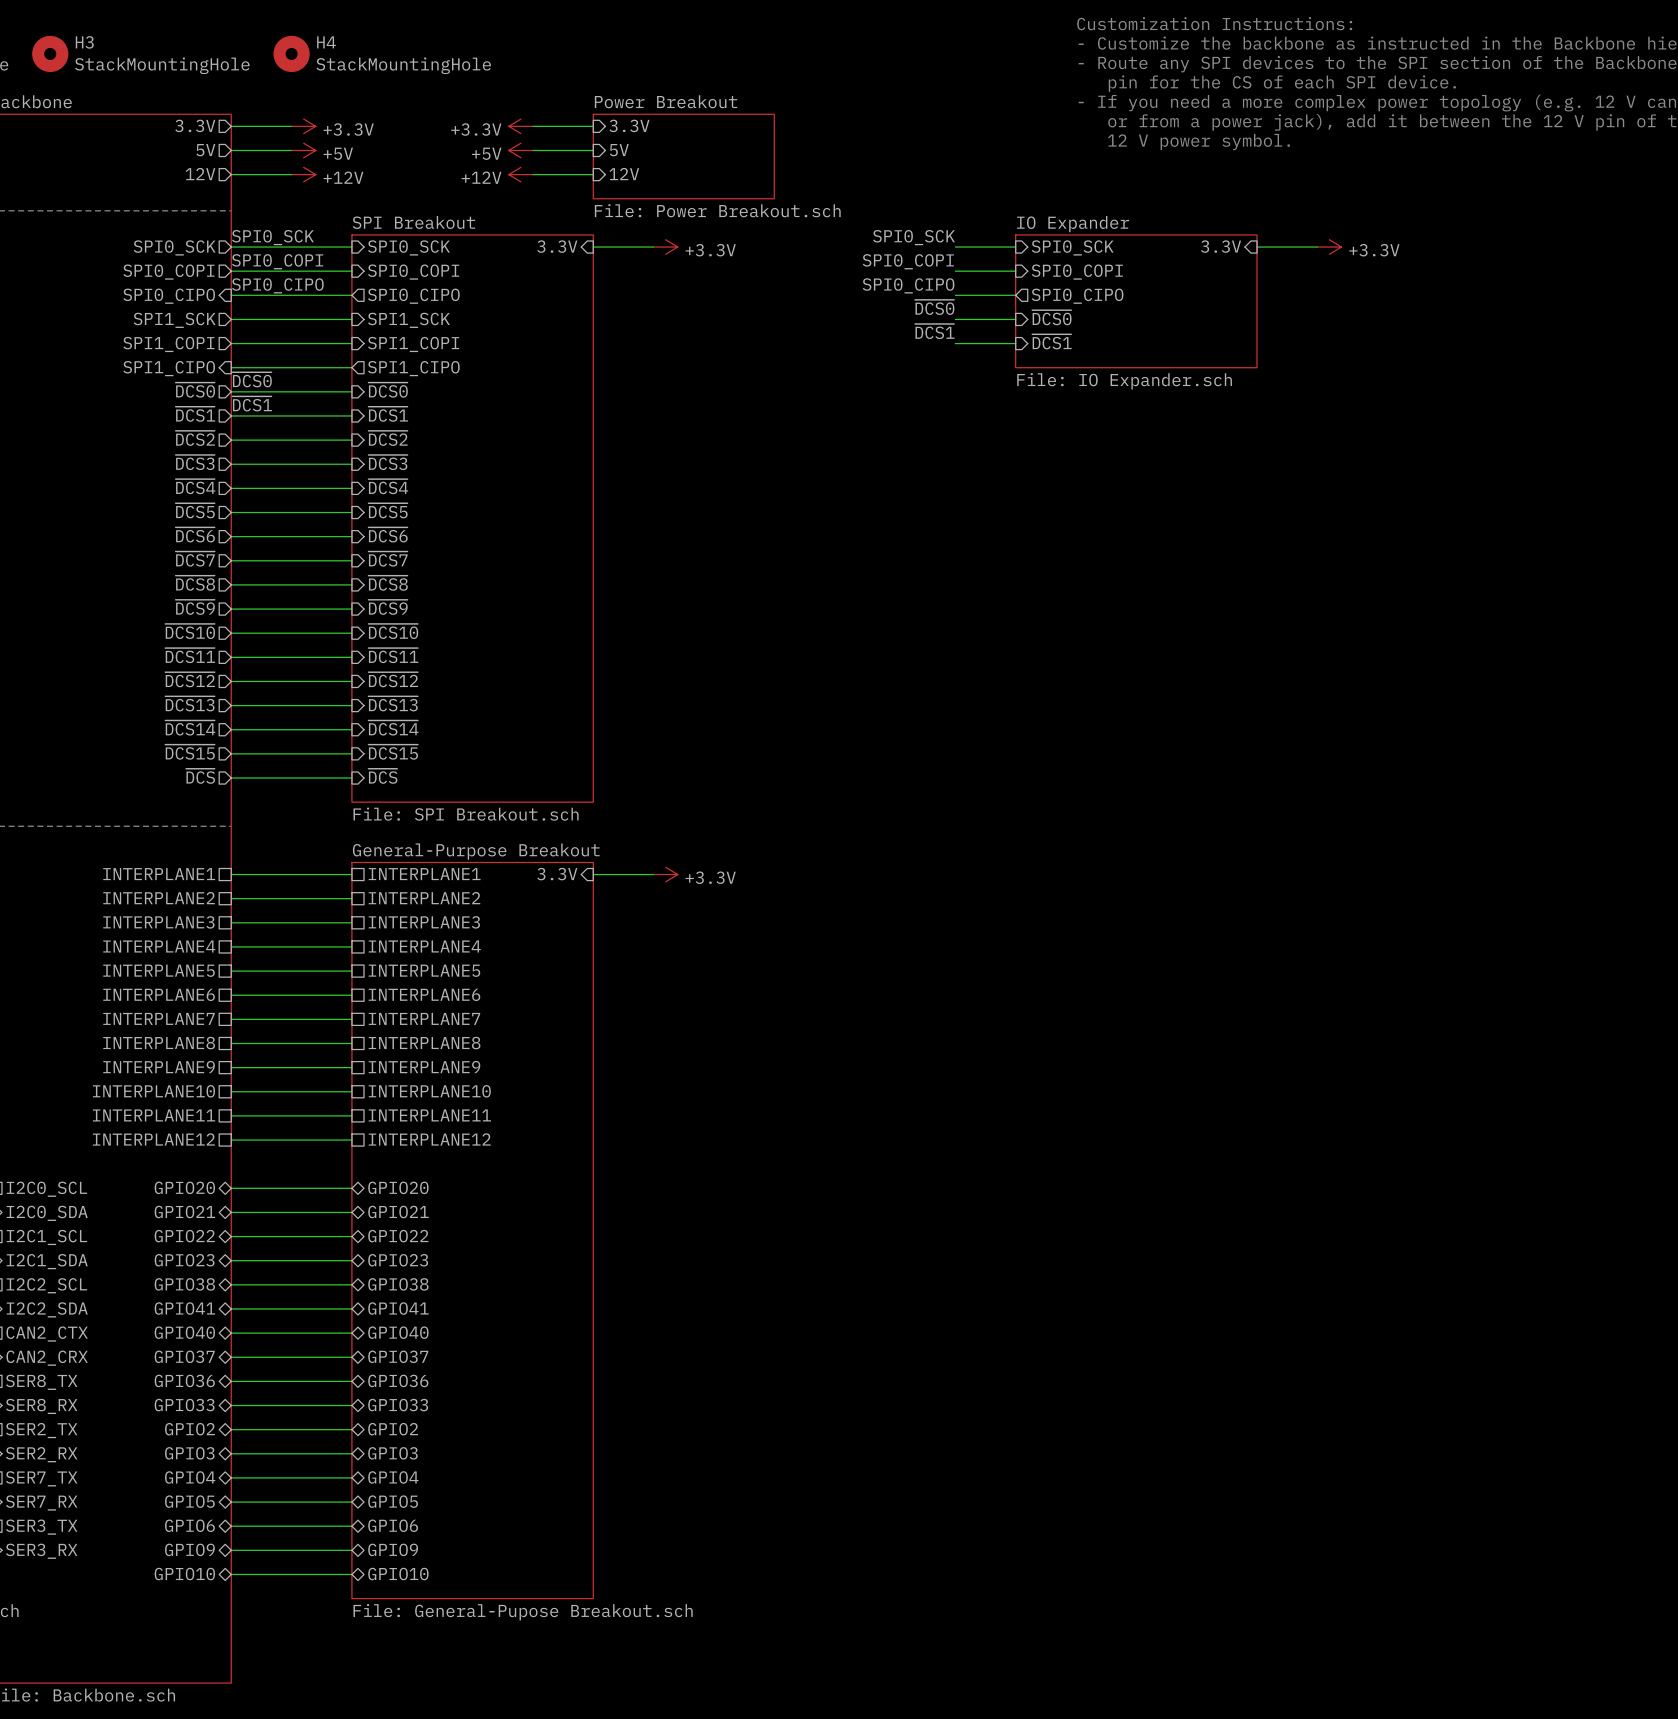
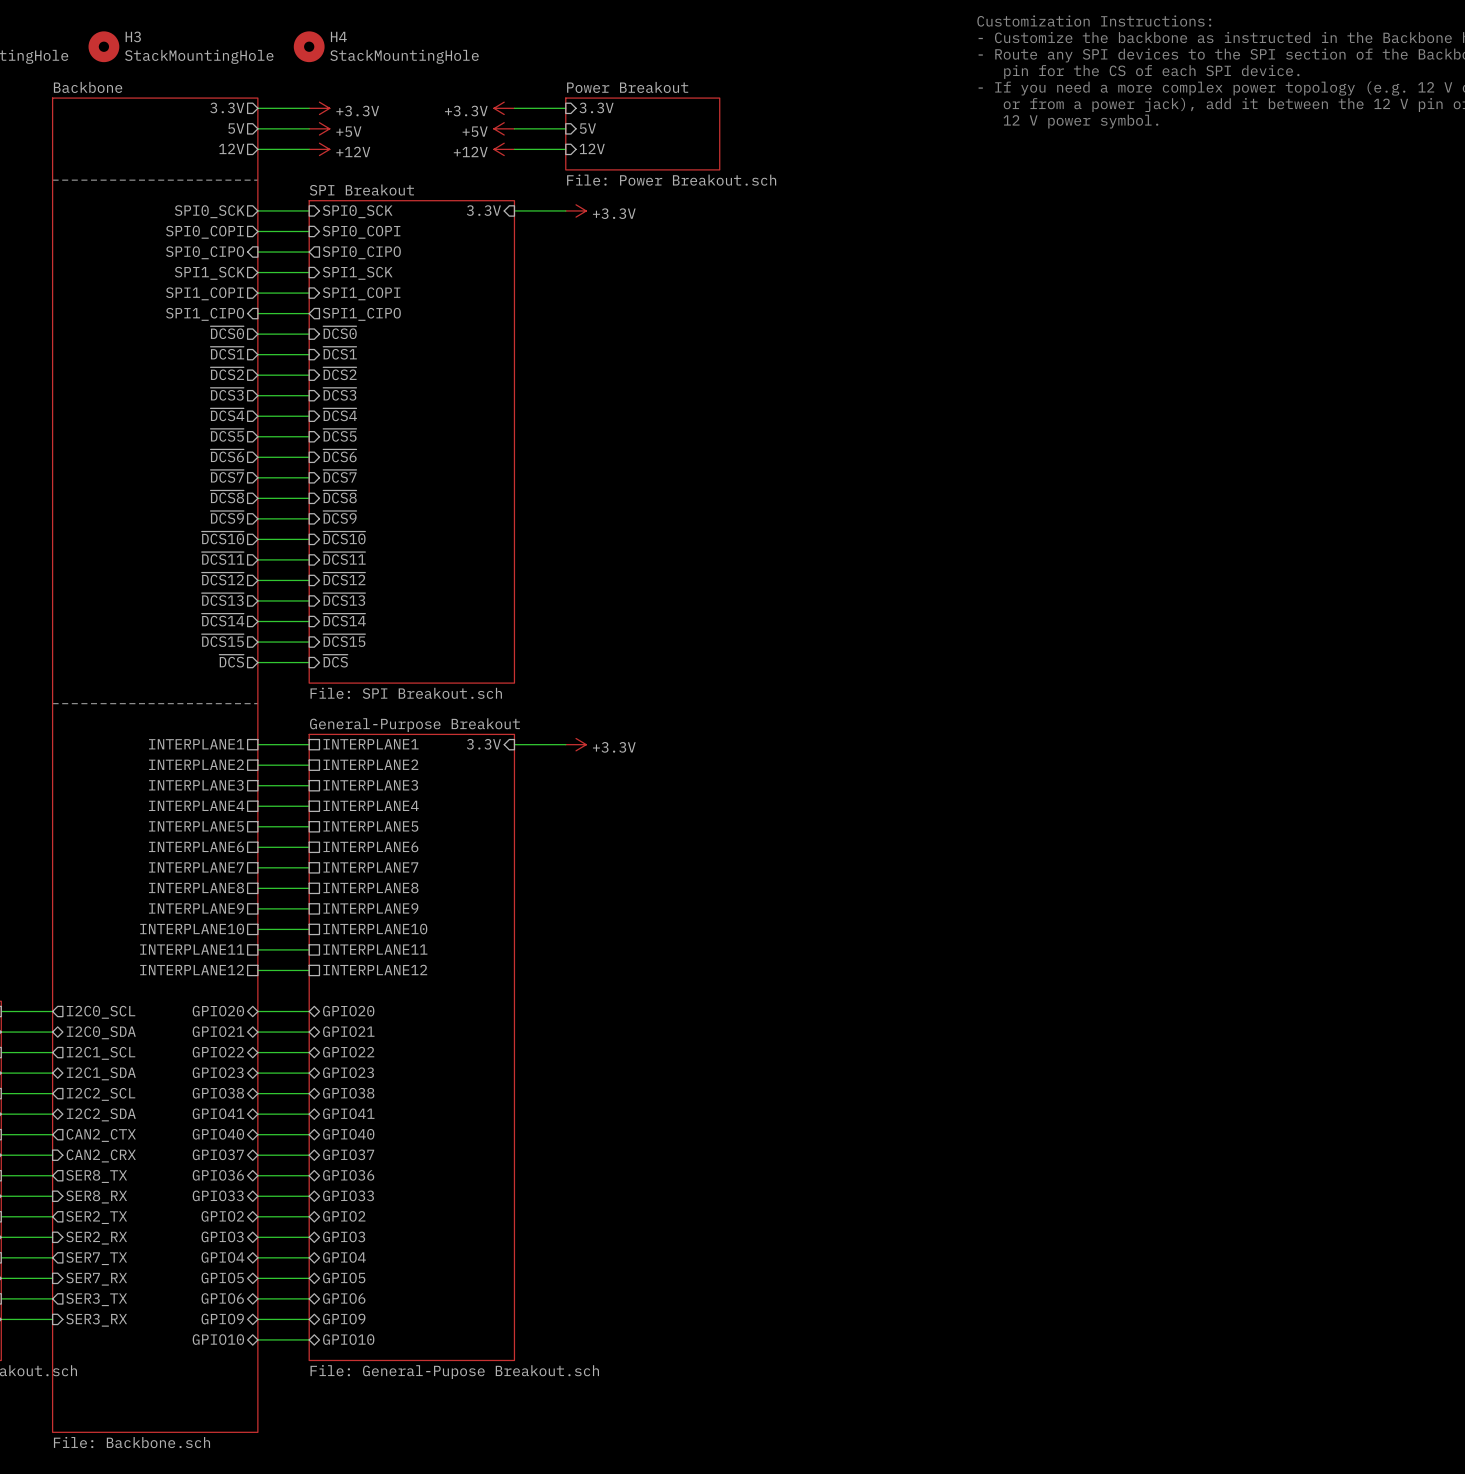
label: SPI0_SCK (272, 237) -> none
label: SPI0_SCK (914, 237) -> none
sheet pin position: 3.3V (557, 246) -> 3.3V (483, 210)
sheet pin: 3.3V (1221, 246) -> none
wire: (291, 247) (351, 247) -> none
sheet pin position: SPI0_SCK (408, 247) -> SPI0_SCK (357, 211)
wire: (593, 247) (653, 247) -> (565, 210) (514, 210)
power symbol position: +3.3V (665, 247) -> +3.3V (576, 210)
wire: (955, 247) (1015, 247) -> none
sheet pin: SPI0_SCK (1072, 247) -> none
wire: (1257, 247) (1317, 247) -> none
power symbol: +3.3V (1329, 247) -> none
label: SPI0_COPI (277, 261) -> none
label: SPI0_COPI (908, 261) -> none
wire: (291, 271) (351, 271) -> none
wire: (955, 271) (1015, 271) -> none
sheet pin position: SPI0_COPI (413, 272) -> SPI0_COPI (361, 232)
sheet pin: SPI0_COPI (1077, 272) -> none
label: SPI0_CIPO (277, 285) -> none
label: SPI0_CIPO (908, 285) -> none
wire: (291, 295) (351, 295) -> none
wire: (955, 295) (1015, 295) -> none
sheet pin position: SPI0_CIPO (413, 296) -> SPI0_CIPO (361, 252)
sheet pin: SPI0_CIPO (1077, 296) -> none
sheet IO Expander: File: IO Expander.sch (1136, 301) -> none
label: ~{DCS0} (934, 307) -> none
sheet pin: ~{DCS0} (1051, 317) -> none
wire: (291, 319) (351, 319) -> none
wire: (955, 319) (1015, 319) -> none
sheet pin position: SPI1_SCK (408, 320) -> SPI1_SCK (357, 273)
label: ~{DCS1} (934, 331) -> none
sheet pin: ~{DCS1} (1051, 341) -> none
wire: (291, 343) (351, 343) -> none
wire: (955, 343) (1015, 343) -> none
sheet pin position: SPI1_COPI (413, 344) -> SPI1_COPI (361, 293)
wire: (291, 367) (351, 367) -> none
sheet pin position: SPI1_CIPO (413, 368) -> SPI1_CIPO (361, 314)
label: ~{DCS0} (252, 379) -> none
sheet pin position: ~{DCS0} (388, 390) -> ~{DCS0} (339, 332)
wire: (291, 391) (351, 391) -> none
label: ~{DCS1} (252, 403) -> none
sheet pin position: ~{DCS1} (388, 414) -> ~{DCS1} (340, 353)
wire: (291, 415) (351, 415) -> none
sheet pin position: ~{DCS2} (388, 438) -> ~{DCS2} (339, 373)
wire: (291, 440) (351, 440) -> none
sheet pin position: ~{DCS3} (388, 462) -> ~{DCS3} (339, 394)
wire: (291, 464) (351, 464) -> none
sheet pin position: ~{DCS4} (388, 486) -> ~{DCS4} (340, 414)
wire: (291, 488) (351, 488) -> none
sheet pin position: ~{DCS5} (388, 510) -> ~{DCS5} (339, 435)
wire: (291, 512) (351, 512) -> none
sheet SPI Breakout position: (472, 518) -> (411, 441)
sheet pin position: ~{DCS6} (388, 534) -> ~{DCS6} (339, 455)
wire: (291, 536) (351, 536) -> none
sheet pin position: ~{DCS7} (388, 559) -> ~{DCS7} (339, 476)
wire: (291, 560) (351, 560) -> none
sheet pin position: ~{DCS8} (388, 583) -> ~{DCS8} (339, 496)
wire: (291, 584) (351, 584) -> none
sheet pin position: ~{DCS9} (388, 607) -> ~{DCS9} (339, 517)
wire: (291, 609) (351, 609) -> none
sheet pin position: ~{DCS10} (393, 631) -> ~{DCS10} (344, 537)
wire: (291, 633) (351, 633) -> none
sheet pin position: ~{DCS11} (393, 655) -> ~{DCS11} (344, 558)
wire: (291, 657) (351, 657) -> none
sheet pin position: ~{DCS12} (393, 679) -> ~{DCS12} (344, 578)
wire: (291, 681) (351, 681) -> none
sheet pin position: ~{DCS13} (393, 703) -> ~{DCS13} (344, 599)
wire: (291, 705) (351, 705) -> none
sheet pin position: ~{DCS14} (393, 728) -> ~{DCS14} (344, 620)
wire: (291, 729) (351, 729) -> none
sheet pin position: ~{DCS15} (393, 752) -> ~{DCS15} (344, 640)
wire: (291, 753) (351, 753) -> none
sheet pin position: ~{DCS} (382, 776) -> ~{DCS} (335, 661)
wire: (291, 778) (351, 778) -> none
wire: (291, 874) (351, 874) -> none
sheet pin position: INTERPLANE1 (424, 874) -> INTERPLANE1 (371, 744)
sheet pin position: 3.3V (557, 874) -> 3.3V (483, 744)
wire: (593, 874) (653, 874) -> (565, 744) (514, 744)
power symbol position: +3.3V (665, 874) -> +3.3V (576, 744)
wire: (291, 898) (351, 898) -> none
sheet pin position: INTERPLANE2 (424, 898) -> INTERPLANE2 (370, 764)
wire: (291, 922) (351, 922) -> none
sheet pin position: INTERPLANE3 (424, 922) -> INTERPLANE3 (370, 785)
wire: (291, 946) (351, 946) -> none
sheet pin position: INTERPLANE4 (424, 946) -> INTERPLANE4 (371, 805)
sheet pin position: INTERPLANE5 (424, 970) -> INTERPLANE5 (370, 826)
wire: (291, 971) (351, 971) -> none
sheet pin position: INTERPLANE6 (424, 994) -> INTERPLANE6 (370, 847)
wire: (291, 995) (351, 995) -> none
sheet pin position: INTERPLANE7 (424, 1018) -> INTERPLANE7 (370, 867)
wire: (291, 1019) (351, 1019) -> none
wire: (291, 1043) (351, 1043) -> none
sheet pin position: INTERPLANE8 (424, 1043) -> INTERPLANE8 (370, 887)
wire: (291, 1067) (351, 1067) -> none
sheet pin position: INTERPLANE9 (424, 1067) -> INTERPLANE9 (370, 908)
wire: (291, 1091) (351, 1091) -> none
sheet pin position: INTERPLANE10 (429, 1091) -> INTERPLANE10 (375, 929)
wire: (291, 1115) (351, 1115) -> none
sheet pin position: INTERPLANE11 (429, 1115) -> INTERPLANE11 (375, 949)
sheet pin position: INTERPLANE12 (429, 1139) -> INTERPLANE12 (375, 969)
wire: (291, 1140) (351, 1140) -> none
sheet pin position: GPIO20 (398, 1187) -> GPIO20 (348, 1011)
wire: (291, 1188) (351, 1188) -> none
sheet pin position: GPIO21 (398, 1211) -> GPIO21 (348, 1031)
wire: (291, 1212) (351, 1212) -> none
sheet General-Purpose Breakout position: (472, 1230) -> (411, 1047)
wire: (291, 1236) (351, 1236) -> none
sheet pin position: GPIO22 (398, 1236) -> GPIO22 (348, 1052)
wire: (291, 1260) (351, 1260) -> none
sheet pin position: GPIO23 (398, 1260) -> GPIO23 (348, 1072)
wire: (291, 1284) (351, 1284) -> none
sheet pin position: GPIO38 (398, 1284) -> GPIO38 (348, 1093)
wire: (291, 1308) (351, 1308) -> none
sheet pin position: GPIO41 (398, 1308) -> GPIO41 (348, 1113)
sheet pin position: GPIO40 (398, 1332) -> GPIO40 (348, 1134)
wire: (291, 1333) (351, 1333) -> none
sheet pin position: GPIO37 (398, 1356) -> GPIO37 (348, 1154)
wire: (291, 1357) (351, 1357) -> none
sheet pin position: GPIO36 (398, 1380) -> GPIO36 (348, 1175)
wire: (291, 1381) (351, 1381) -> none
wire: (291, 1405) (351, 1405) -> none
sheet pin position: GPIO33 (398, 1405) -> GPIO33 (348, 1195)
wire: (291, 1429) (351, 1429) -> none
sheet pin position: GPIO2 (393, 1429) -> GPIO2 (344, 1216)
wire: (291, 1453) (351, 1453) -> none
sheet pin position: GPIO3 (392, 1453) -> GPIO3 (344, 1236)
wire: (291, 1477) (351, 1477) -> none
sheet pin position: GPIO4 (393, 1477) -> GPIO4 (344, 1257)
sheet pin position: GPIO5 (393, 1501) -> GPIO5 (344, 1277)
wire: (291, 1502) (351, 1502) -> none
sheet pin position: GPIO6 (393, 1525) -> GPIO6 (344, 1298)
wire: (291, 1526) (351, 1526) -> none
sheet pin position: GPIO9 (393, 1549) -> GPIO9 (344, 1319)
wire: (291, 1550) (351, 1550) -> none
wire: (291, 1574) (351, 1574) -> none
sheet pin position: GPIO10 (398, 1574) -> GPIO10 (348, 1339)

